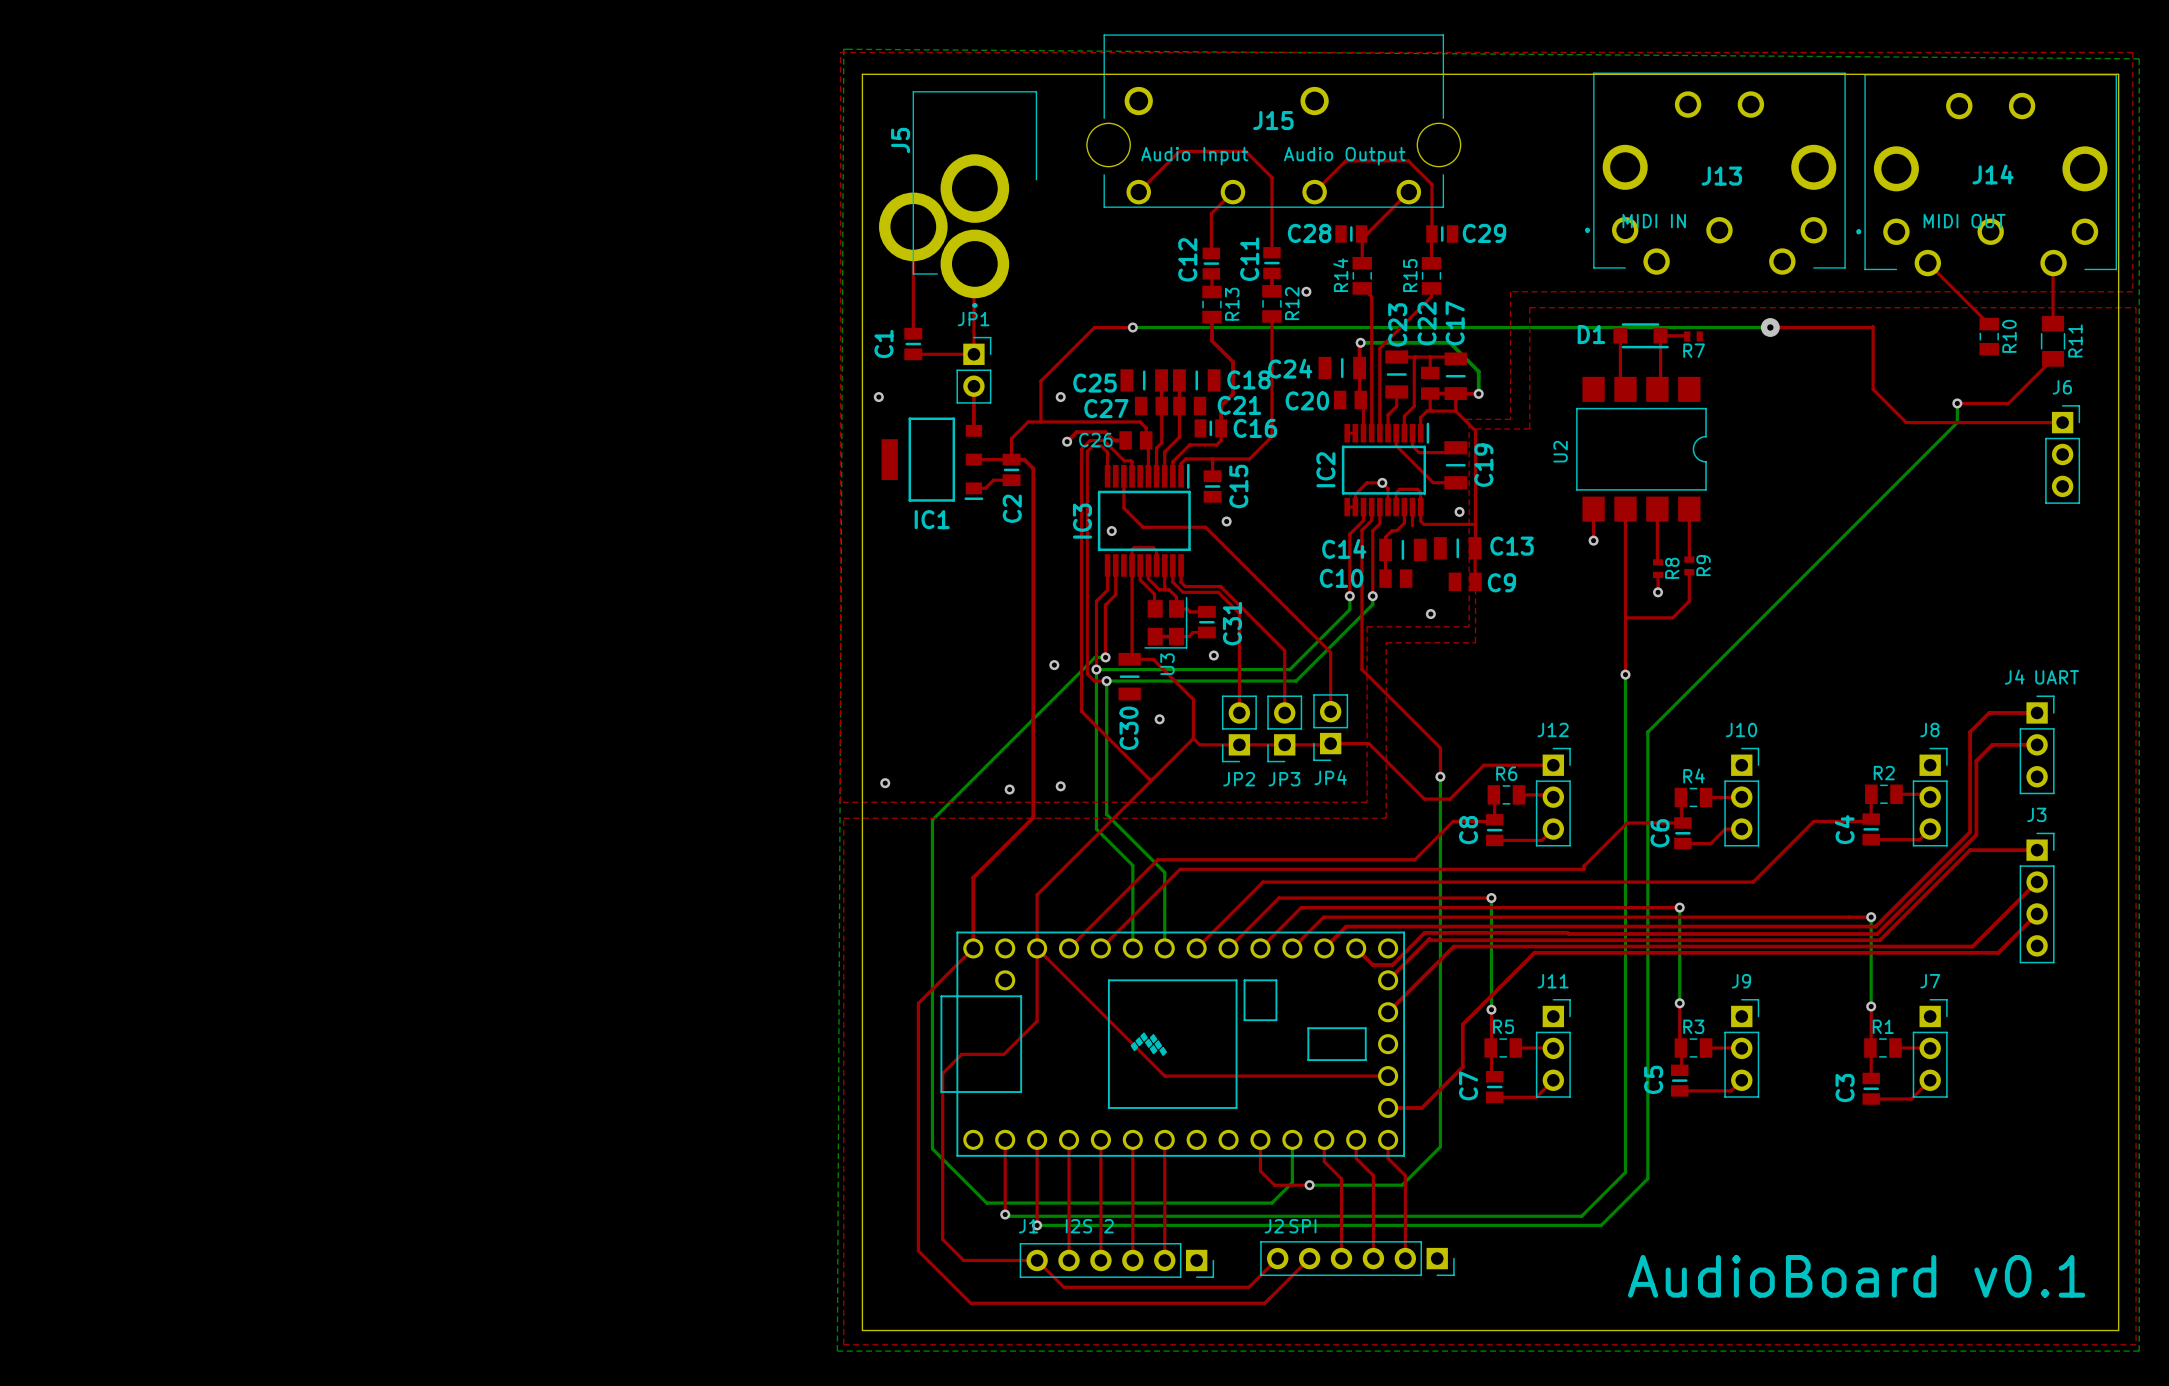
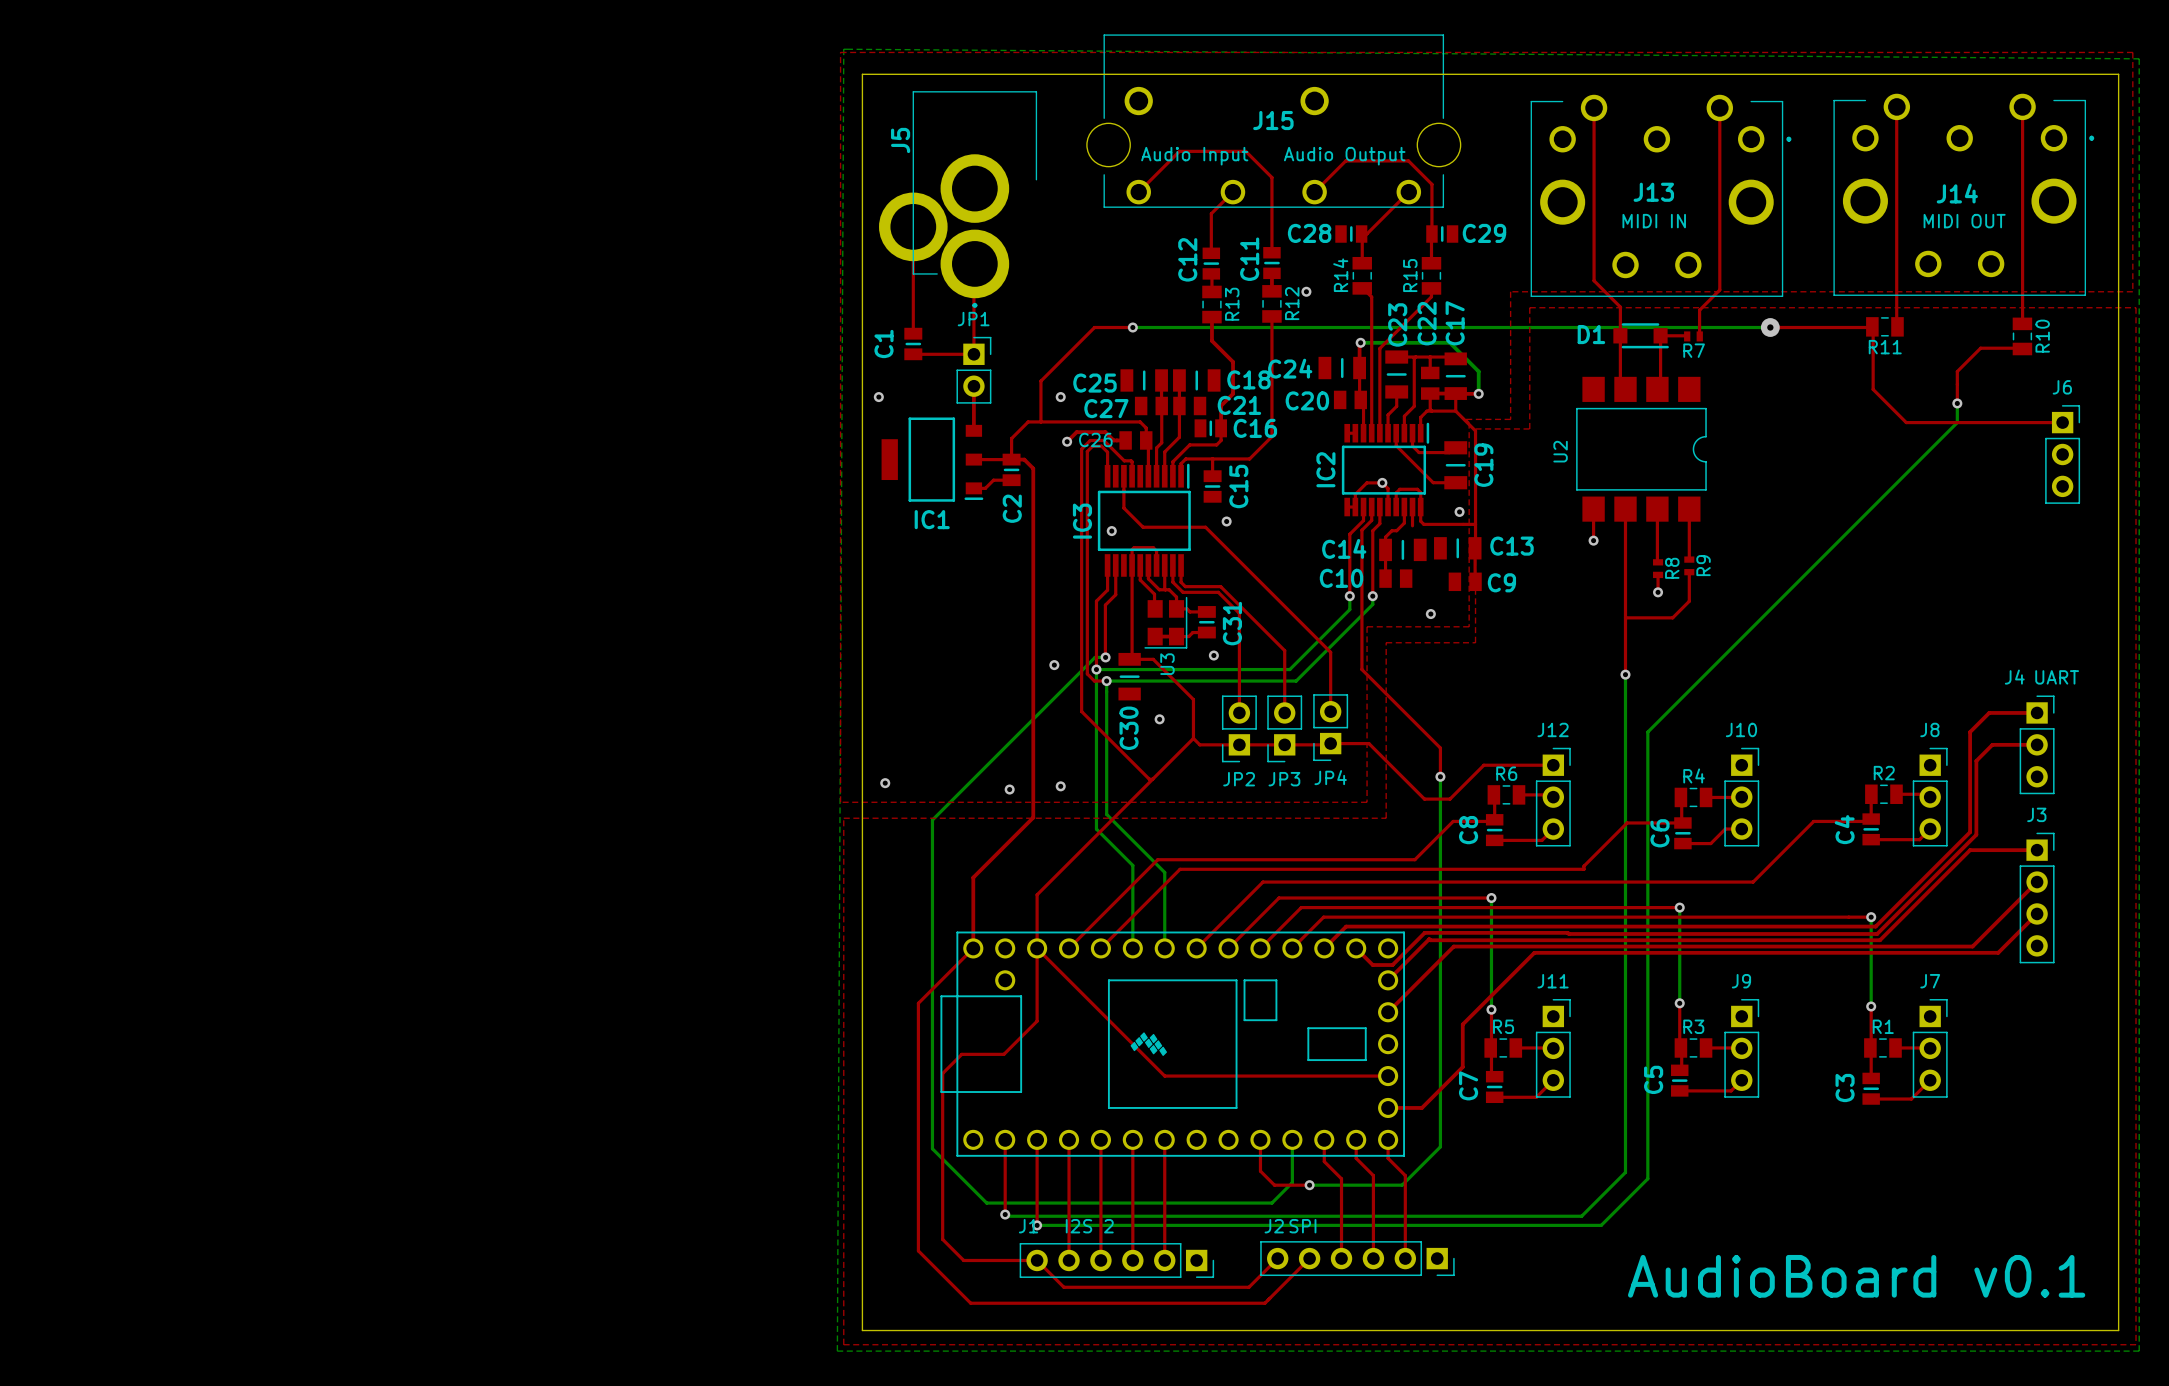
top track: none -> (2022, 106) (2022, 324)
top track: none -> (1594, 107) (1594, 280) (1620, 307) (1620, 335)
top track: none -> (1719, 107) (1719, 289) (1699, 310) (1699, 336)
top track: none -> (1896, 107) (1896, 326)
J13 rotation: 0° (1715, 173) -> 180° (1661, 195)
J14 rotation: 0° (1986, 175) -> 180° (1963, 194)
top track: (1927, 263) (1989, 324) -> none
top track: (2053, 263) (2053, 323) -> none
R11 footprint: [2040, 315, 2066, 367] -> [1866, 317, 1904, 337]
R10 position: (1989, 336) -> (2022, 336)
R11 name position: R11 (2075, 340) -> R11 (1885, 347)
top track: (2053, 358) (2008, 403) (1957, 403) -> (2022, 348) (1980, 348) (1957, 371) (1957, 403)

